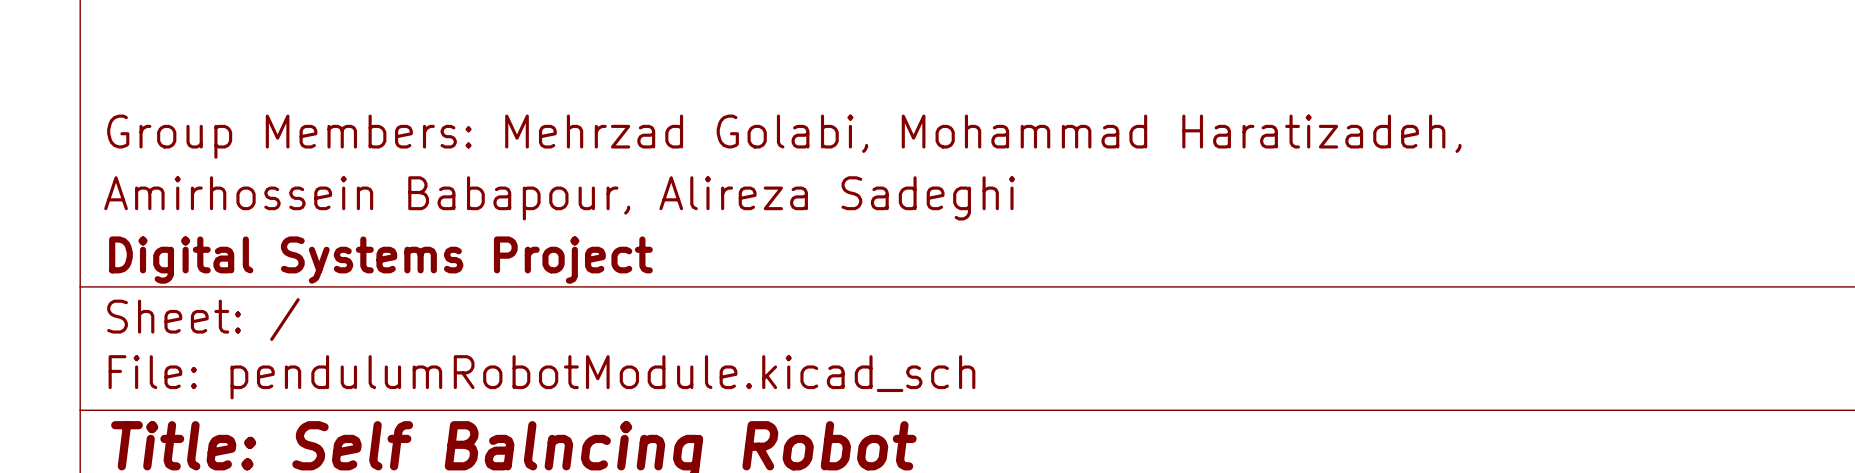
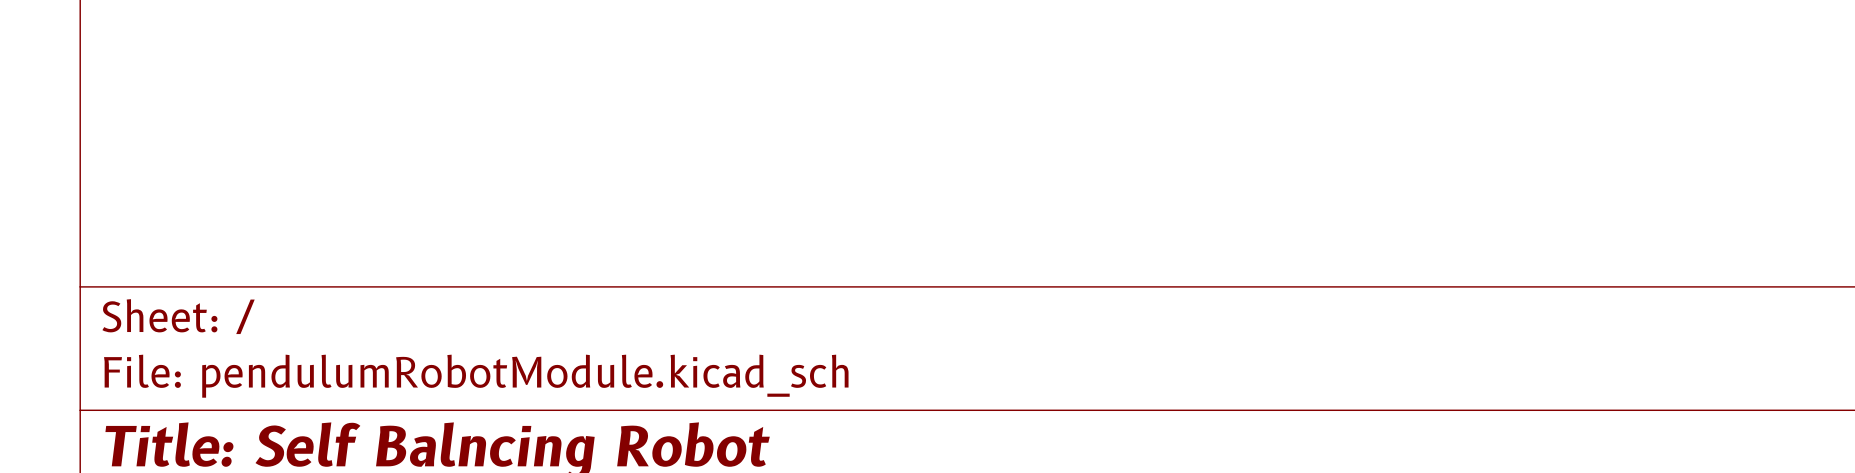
title block: Group Members: Mehrzad Golabi, Mohammad Haratizadeh, (784, 136) -> none
title block: Amirhossein Babapour, Alireza Sadeghi (559, 198) -> none
title block: Digital Systems Project (380, 260) -> none

